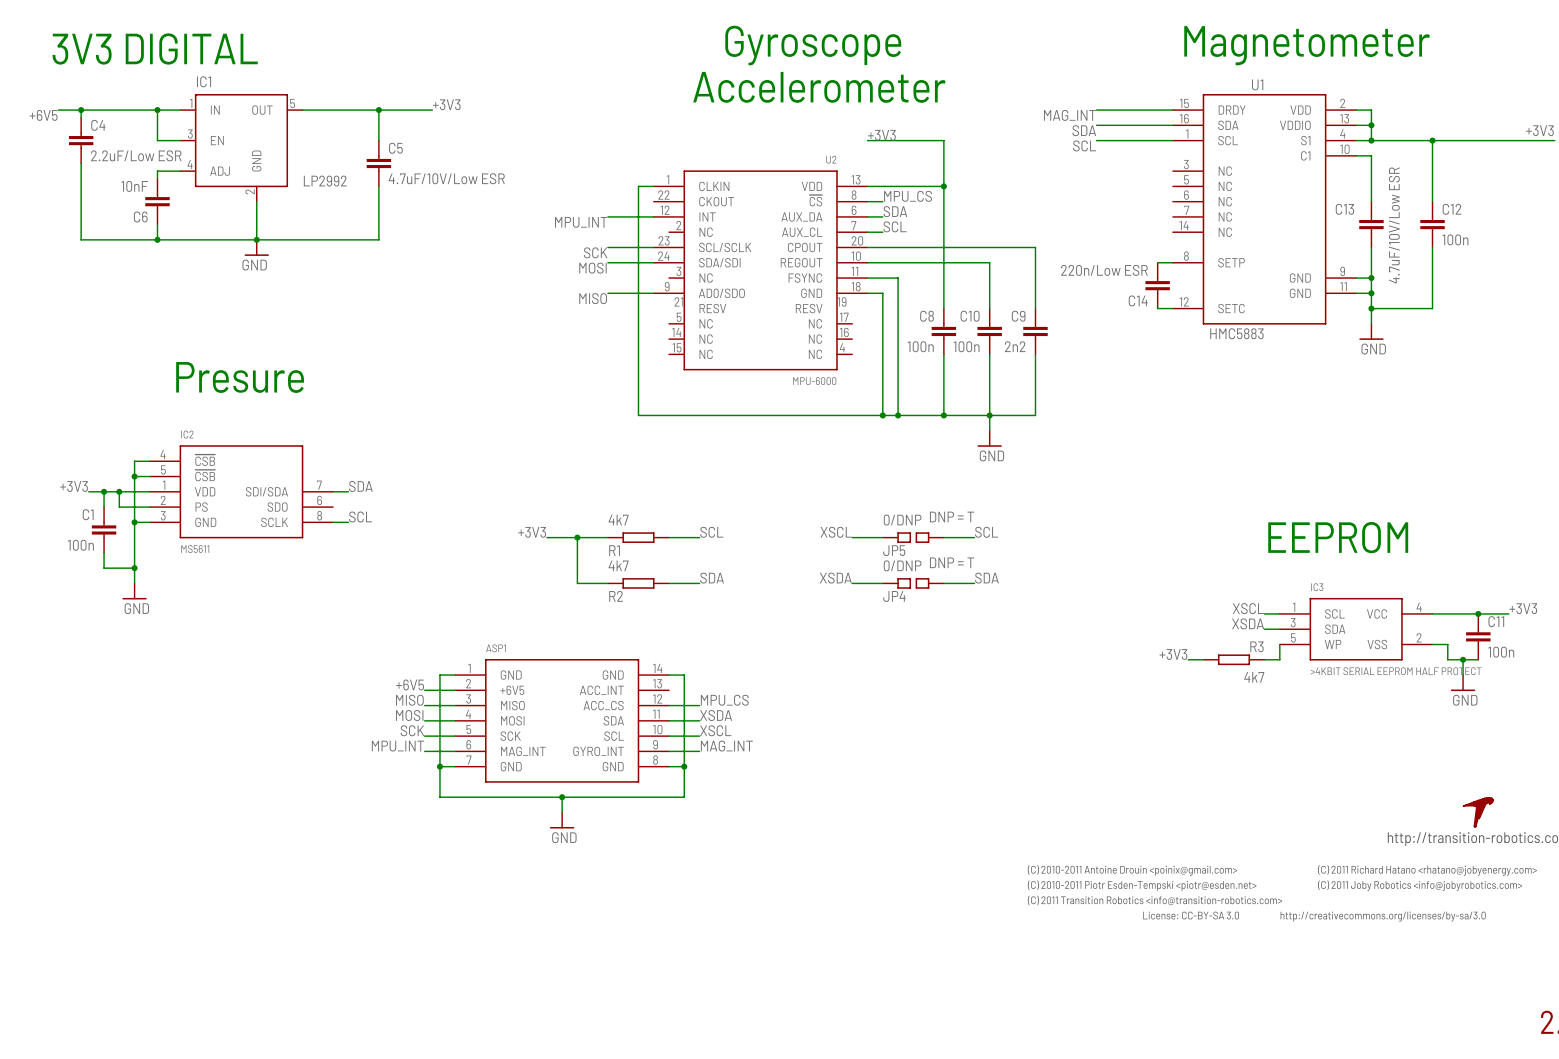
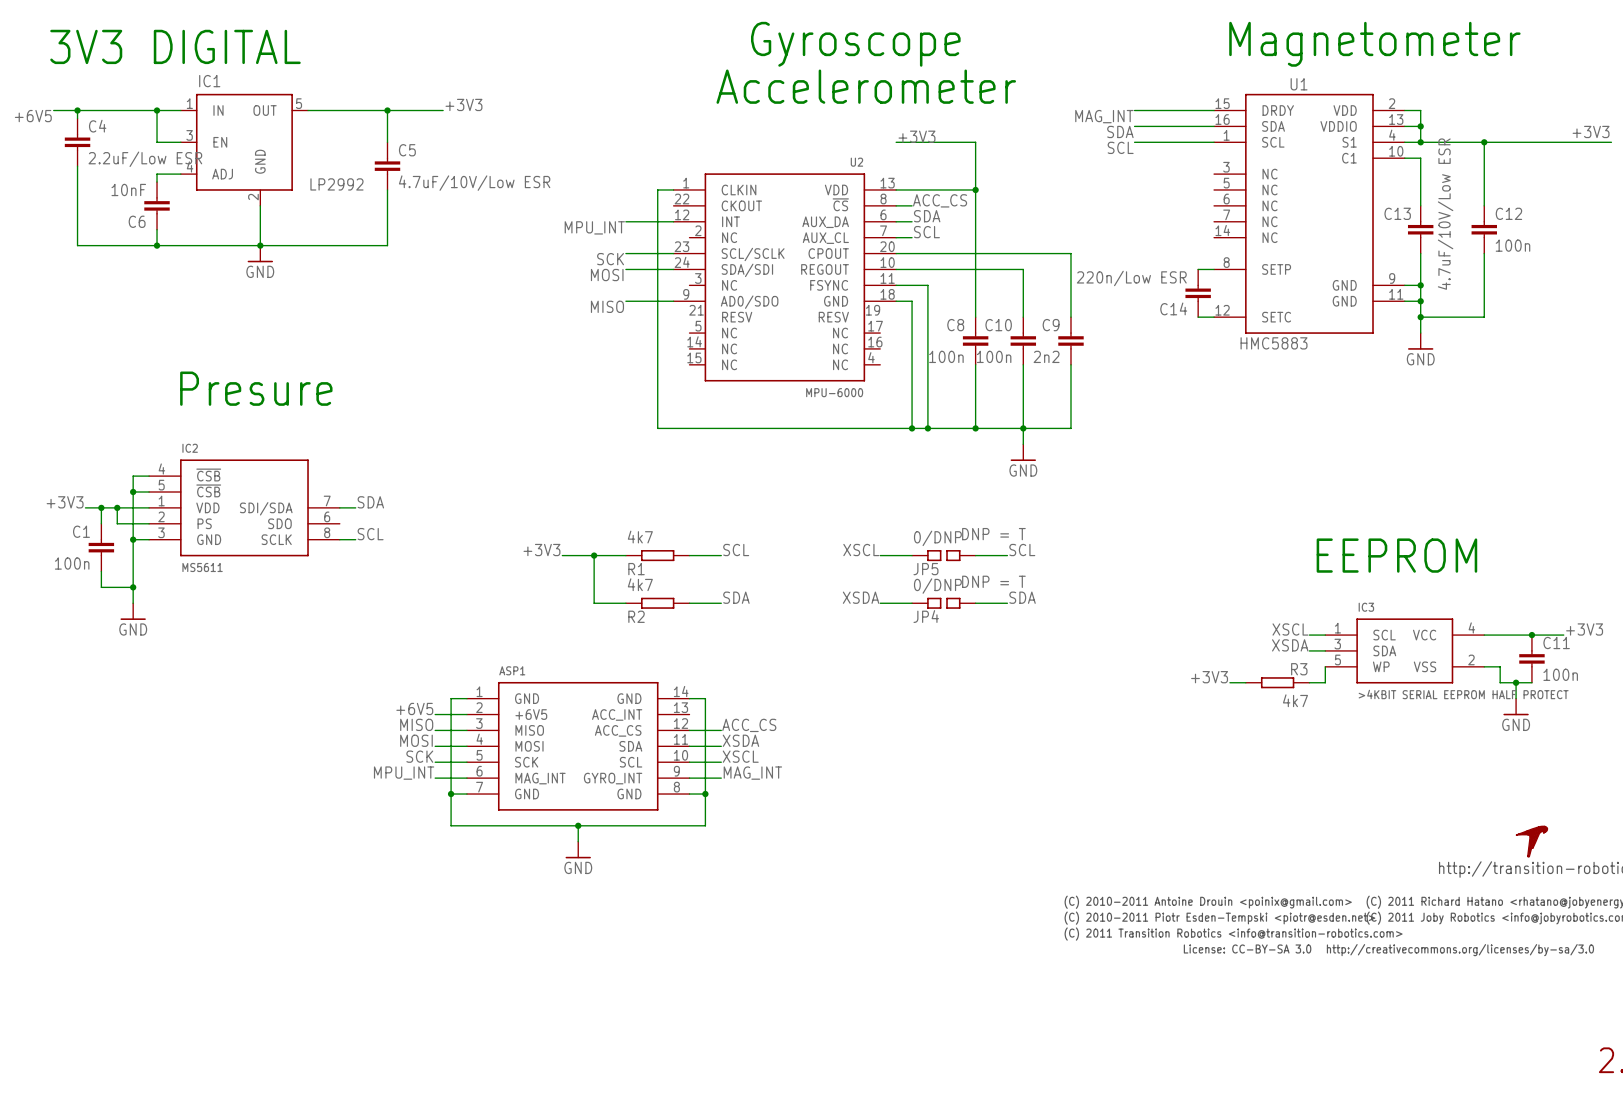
label: MPU_CS (908, 196) -> ACC_CS (940, 200)
label: MPU_CS (724, 700) -> ACC_CS (749, 725)

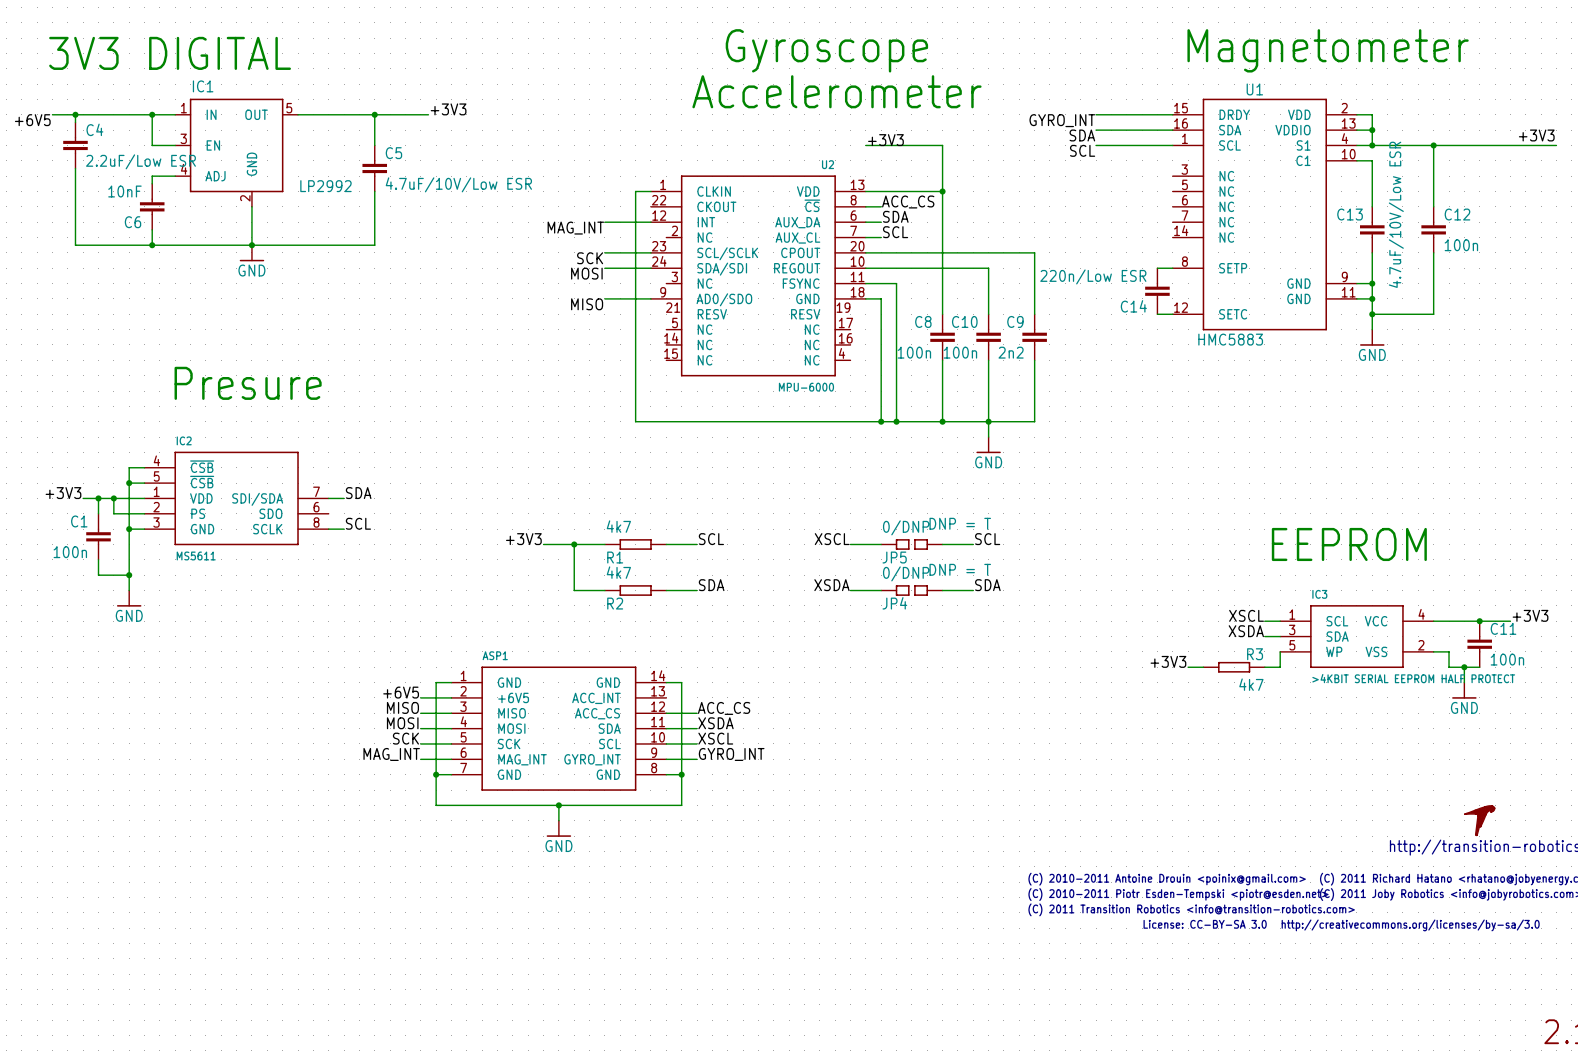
label: MAG_INT (1104, 116) -> GYRO_INT (1062, 120)
label: MPU_INT (594, 227) -> MAG_INT (575, 228)
label: MPU_INT (404, 773) -> MAG_INT (391, 754)
label: MAG_INT (752, 773) -> GYRO_INT (731, 754)

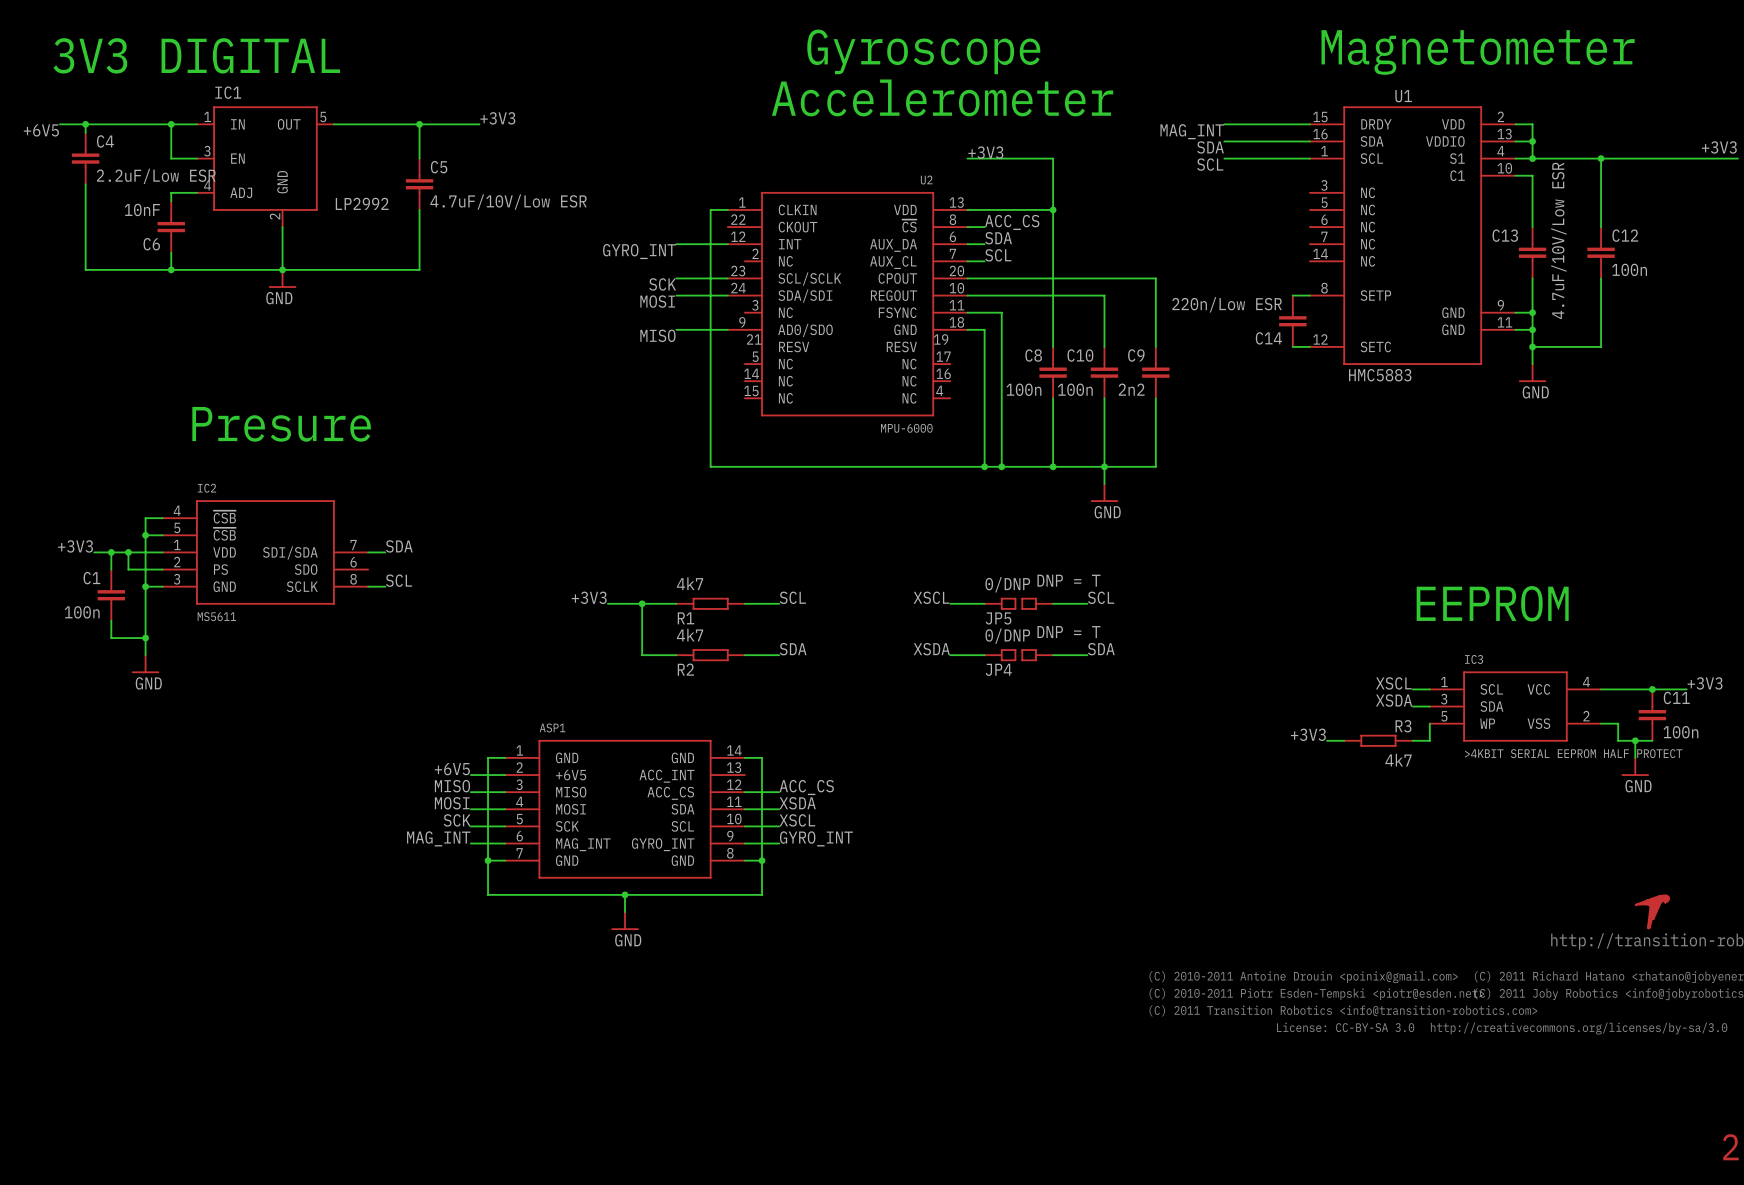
label: GYRO_INT (1062, 120) -> MAG_INT (1192, 131)
label: MAG_INT (575, 228) -> GYRO_INT (639, 251)

